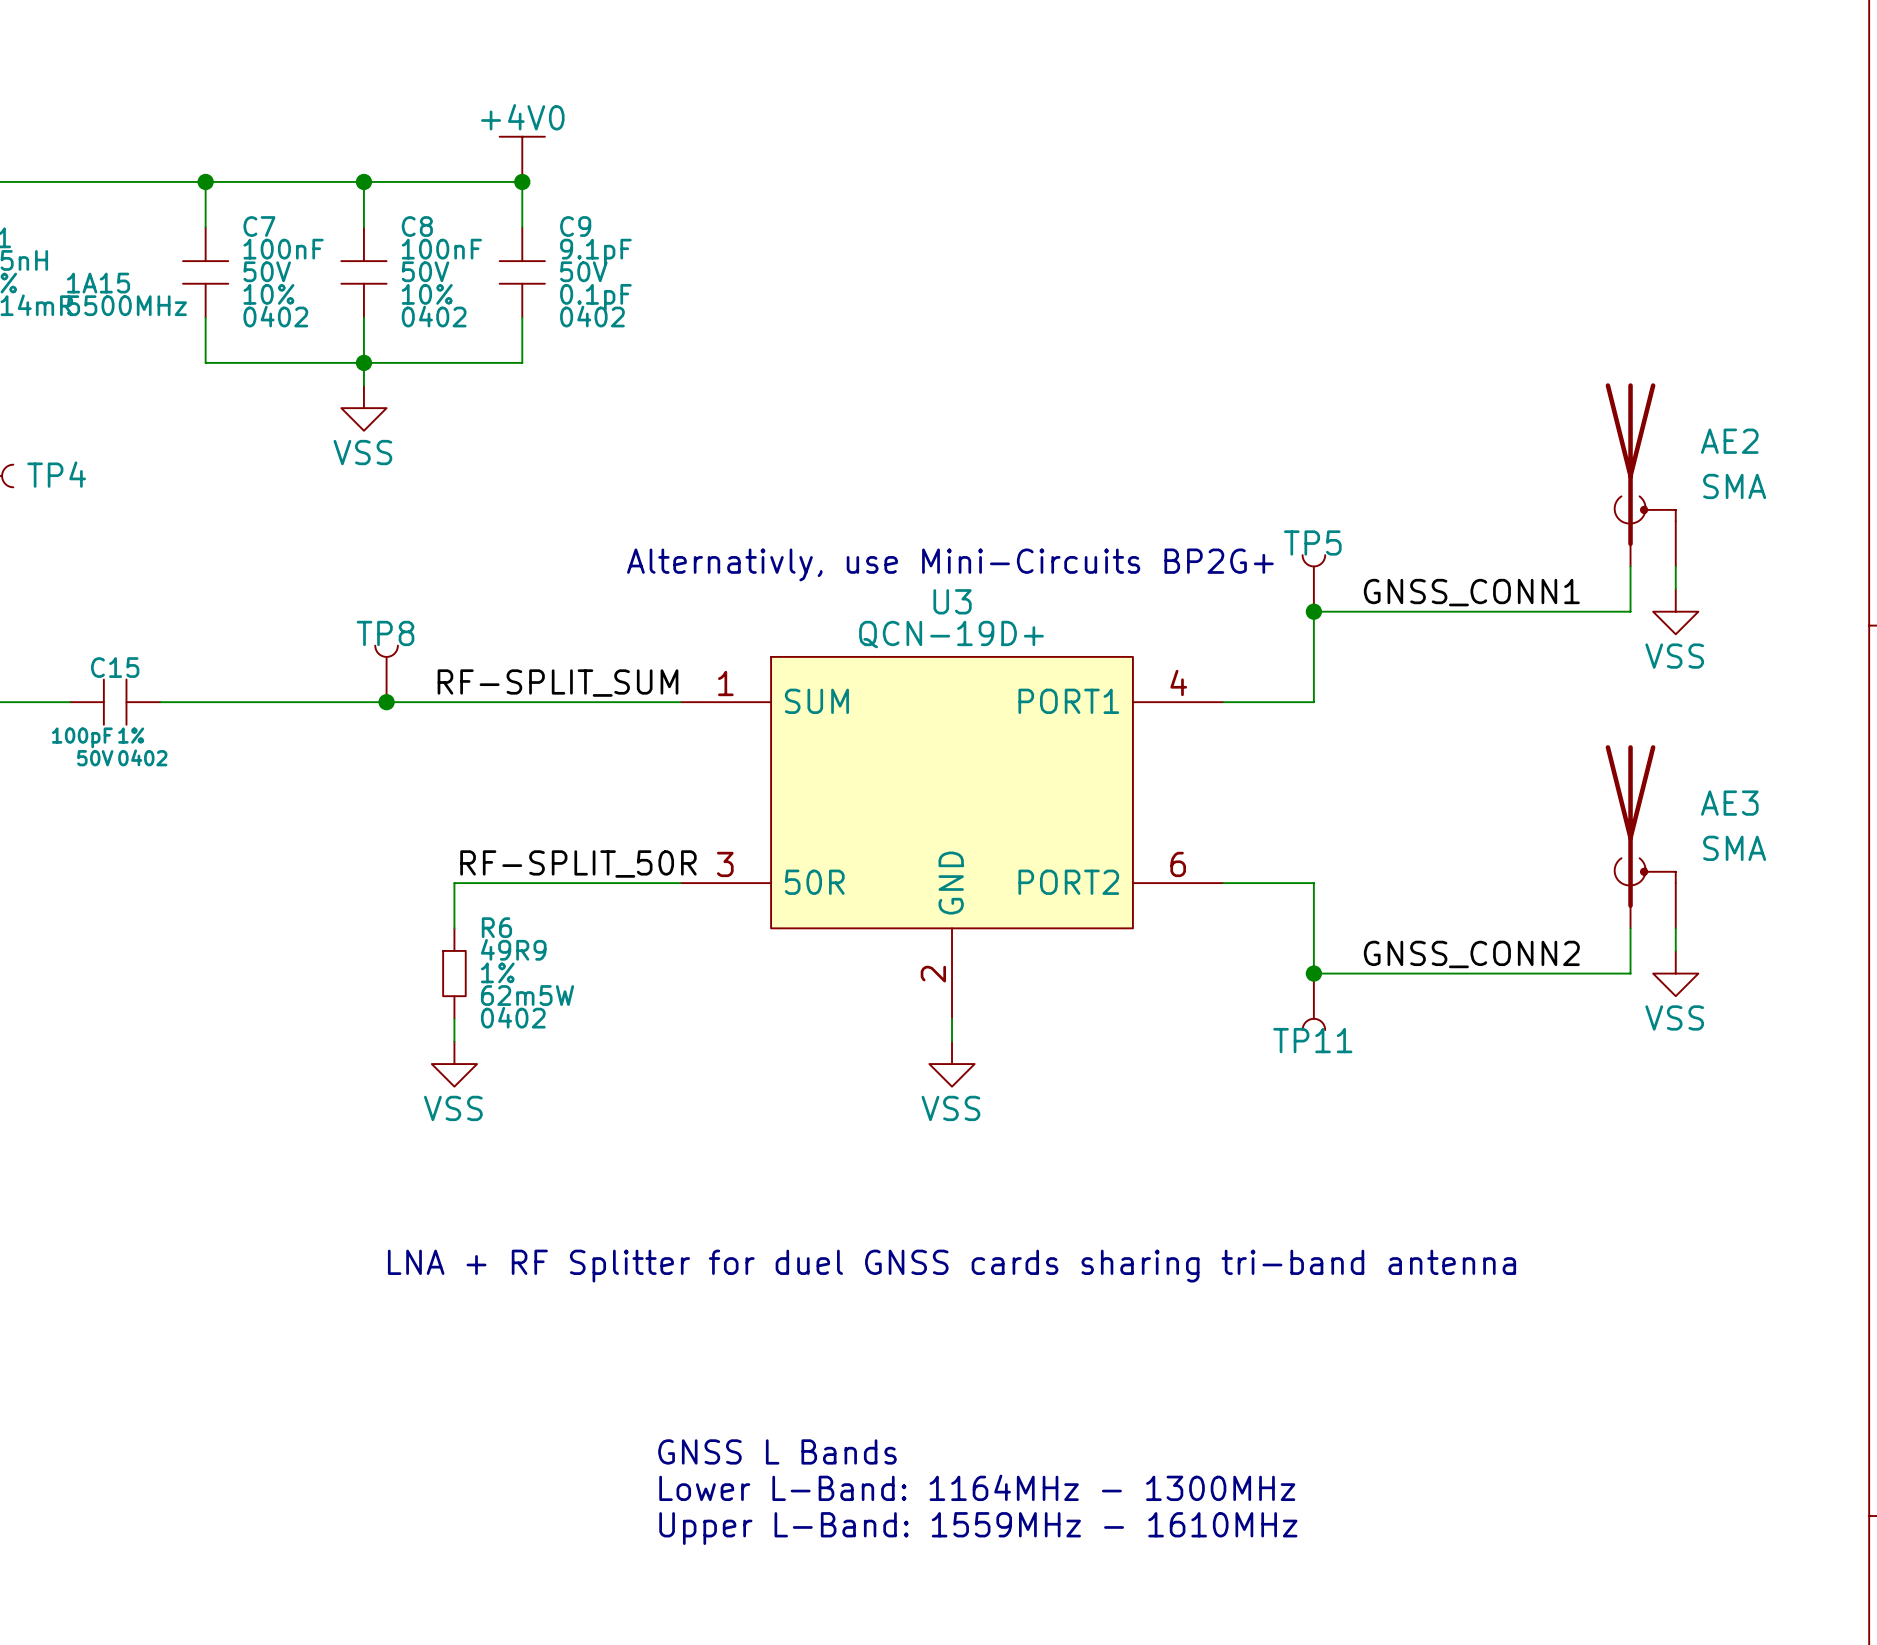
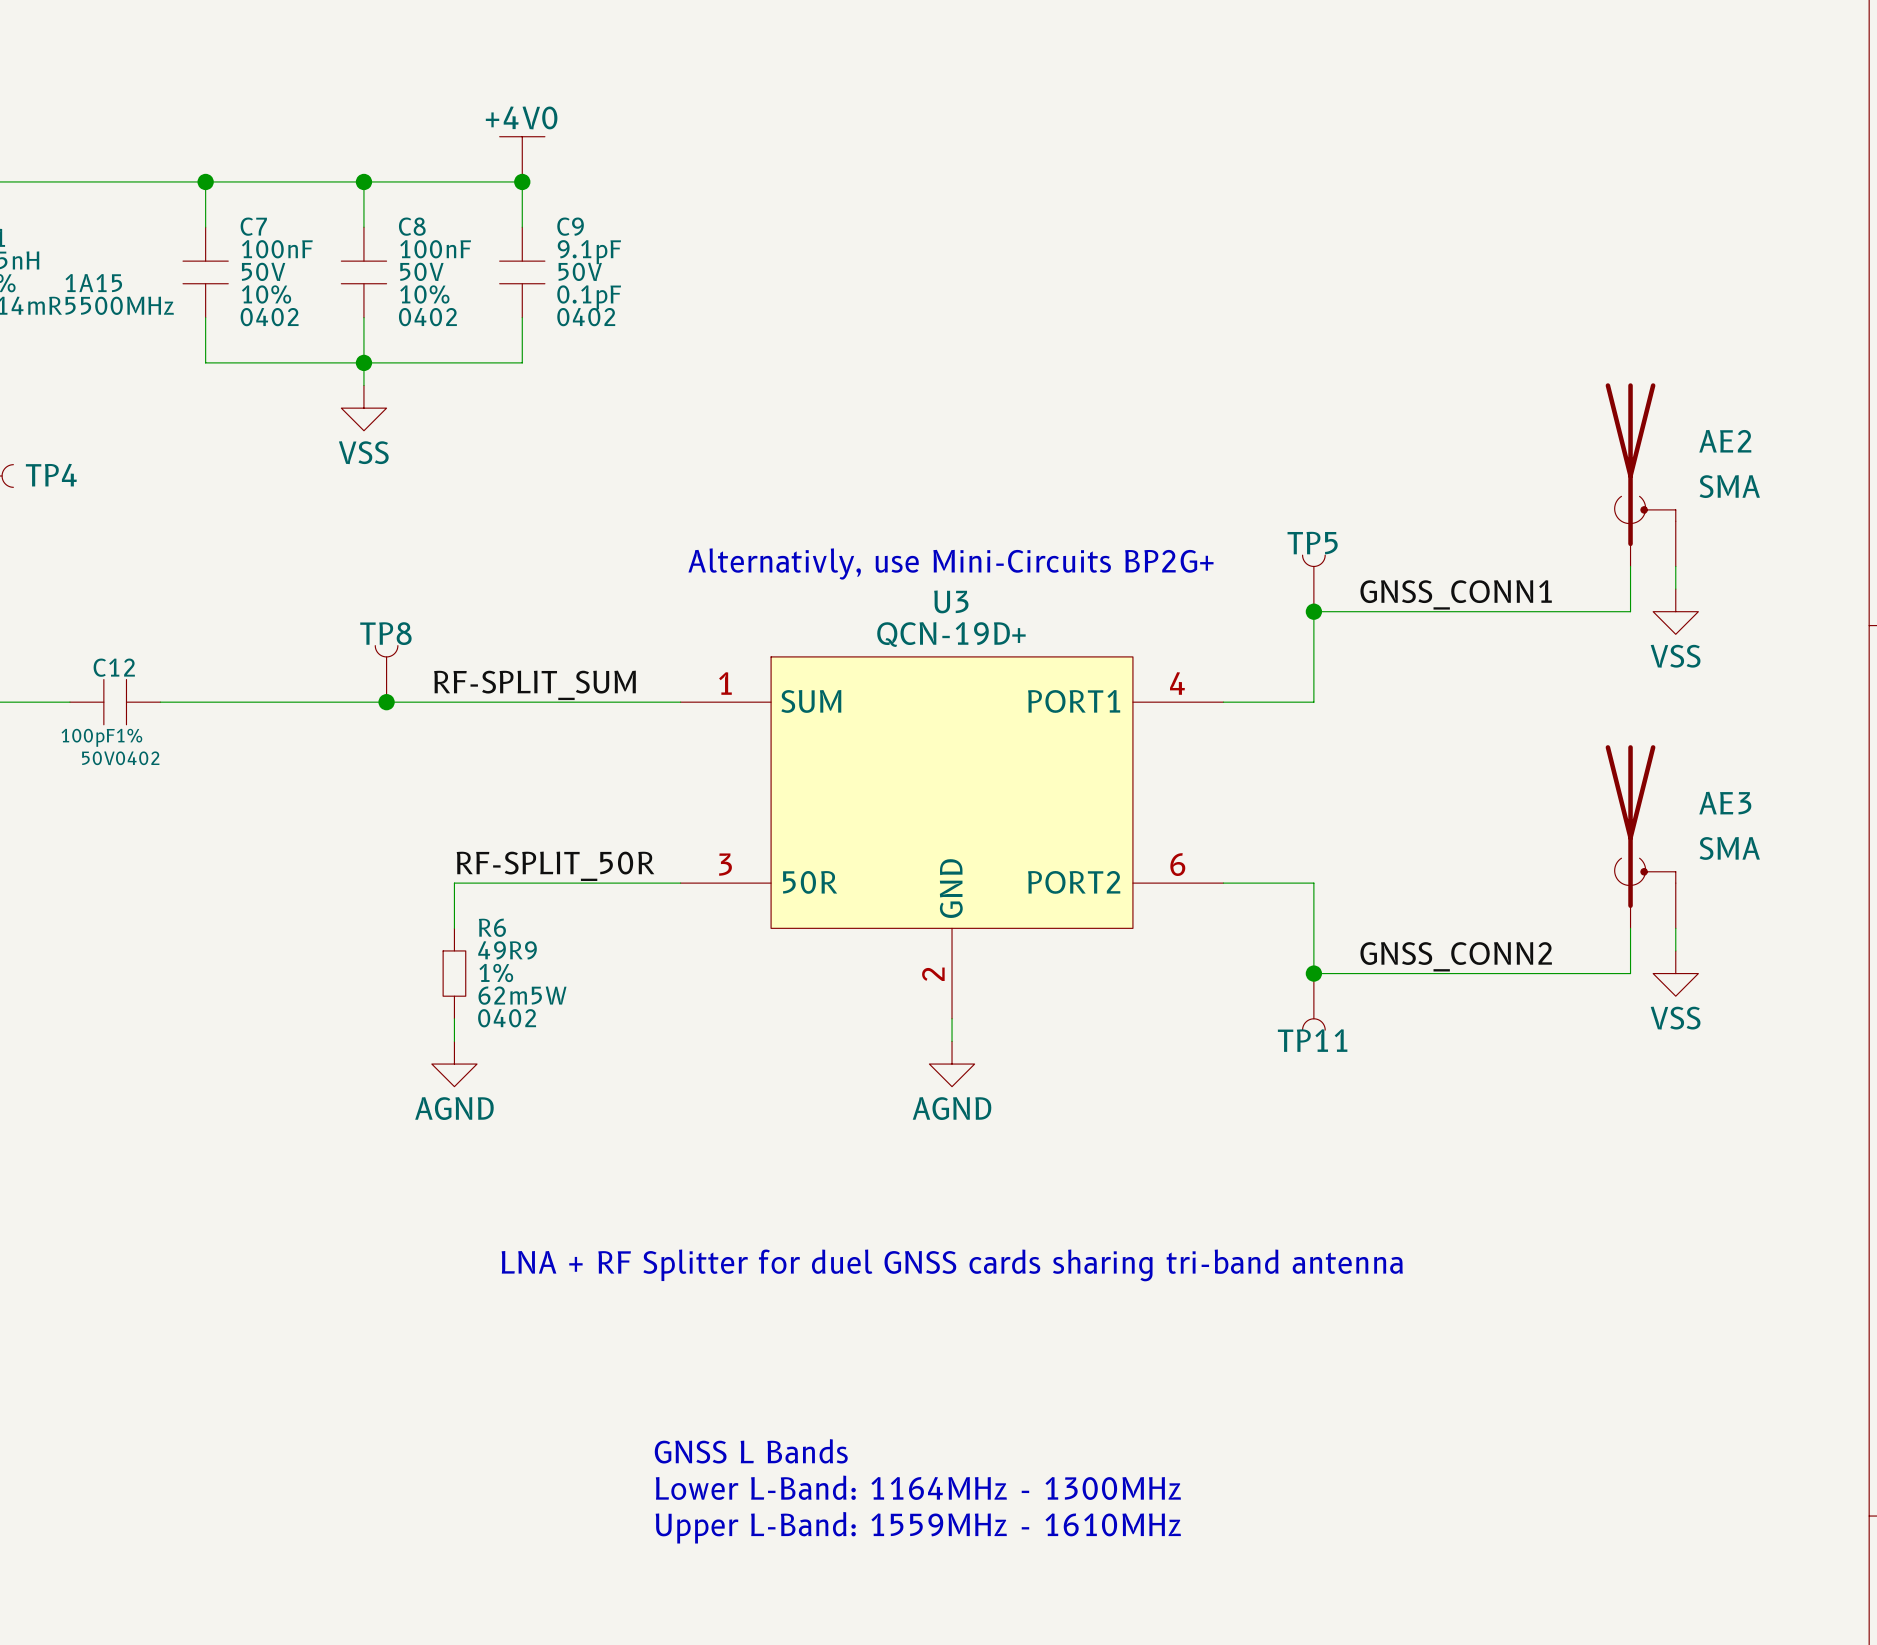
C15 name: C15 (115, 667) -> C12 (114, 667)
power symbol: VSS (454, 1064) -> AGND (454, 1064)
power symbol: VSS (952, 1064) -> AGND (952, 1064)

